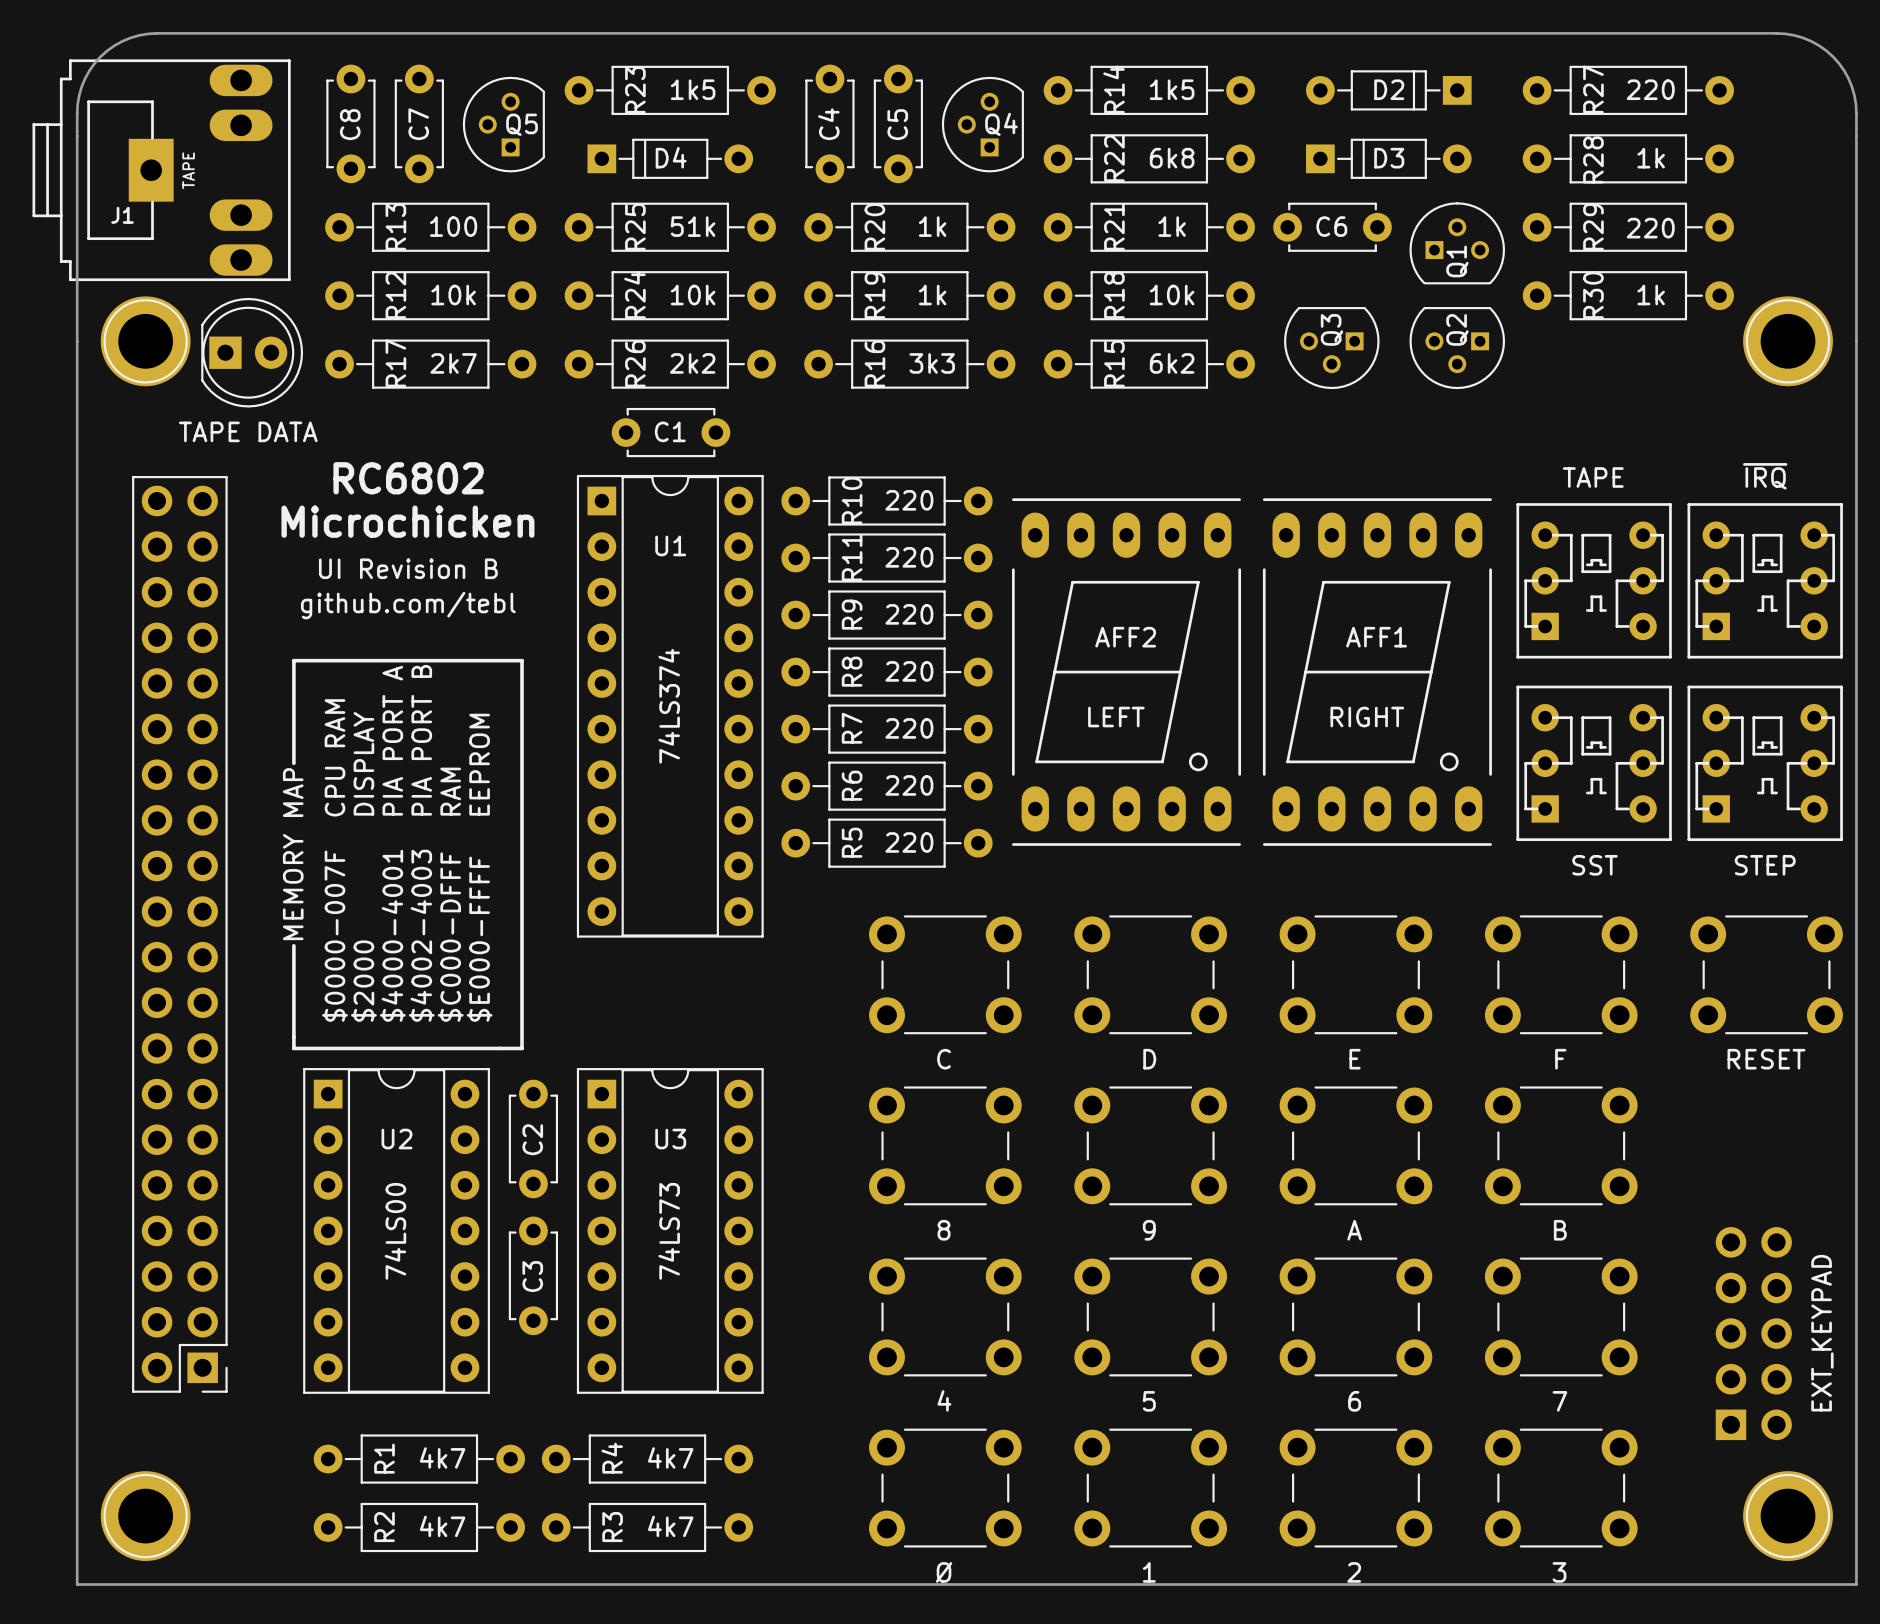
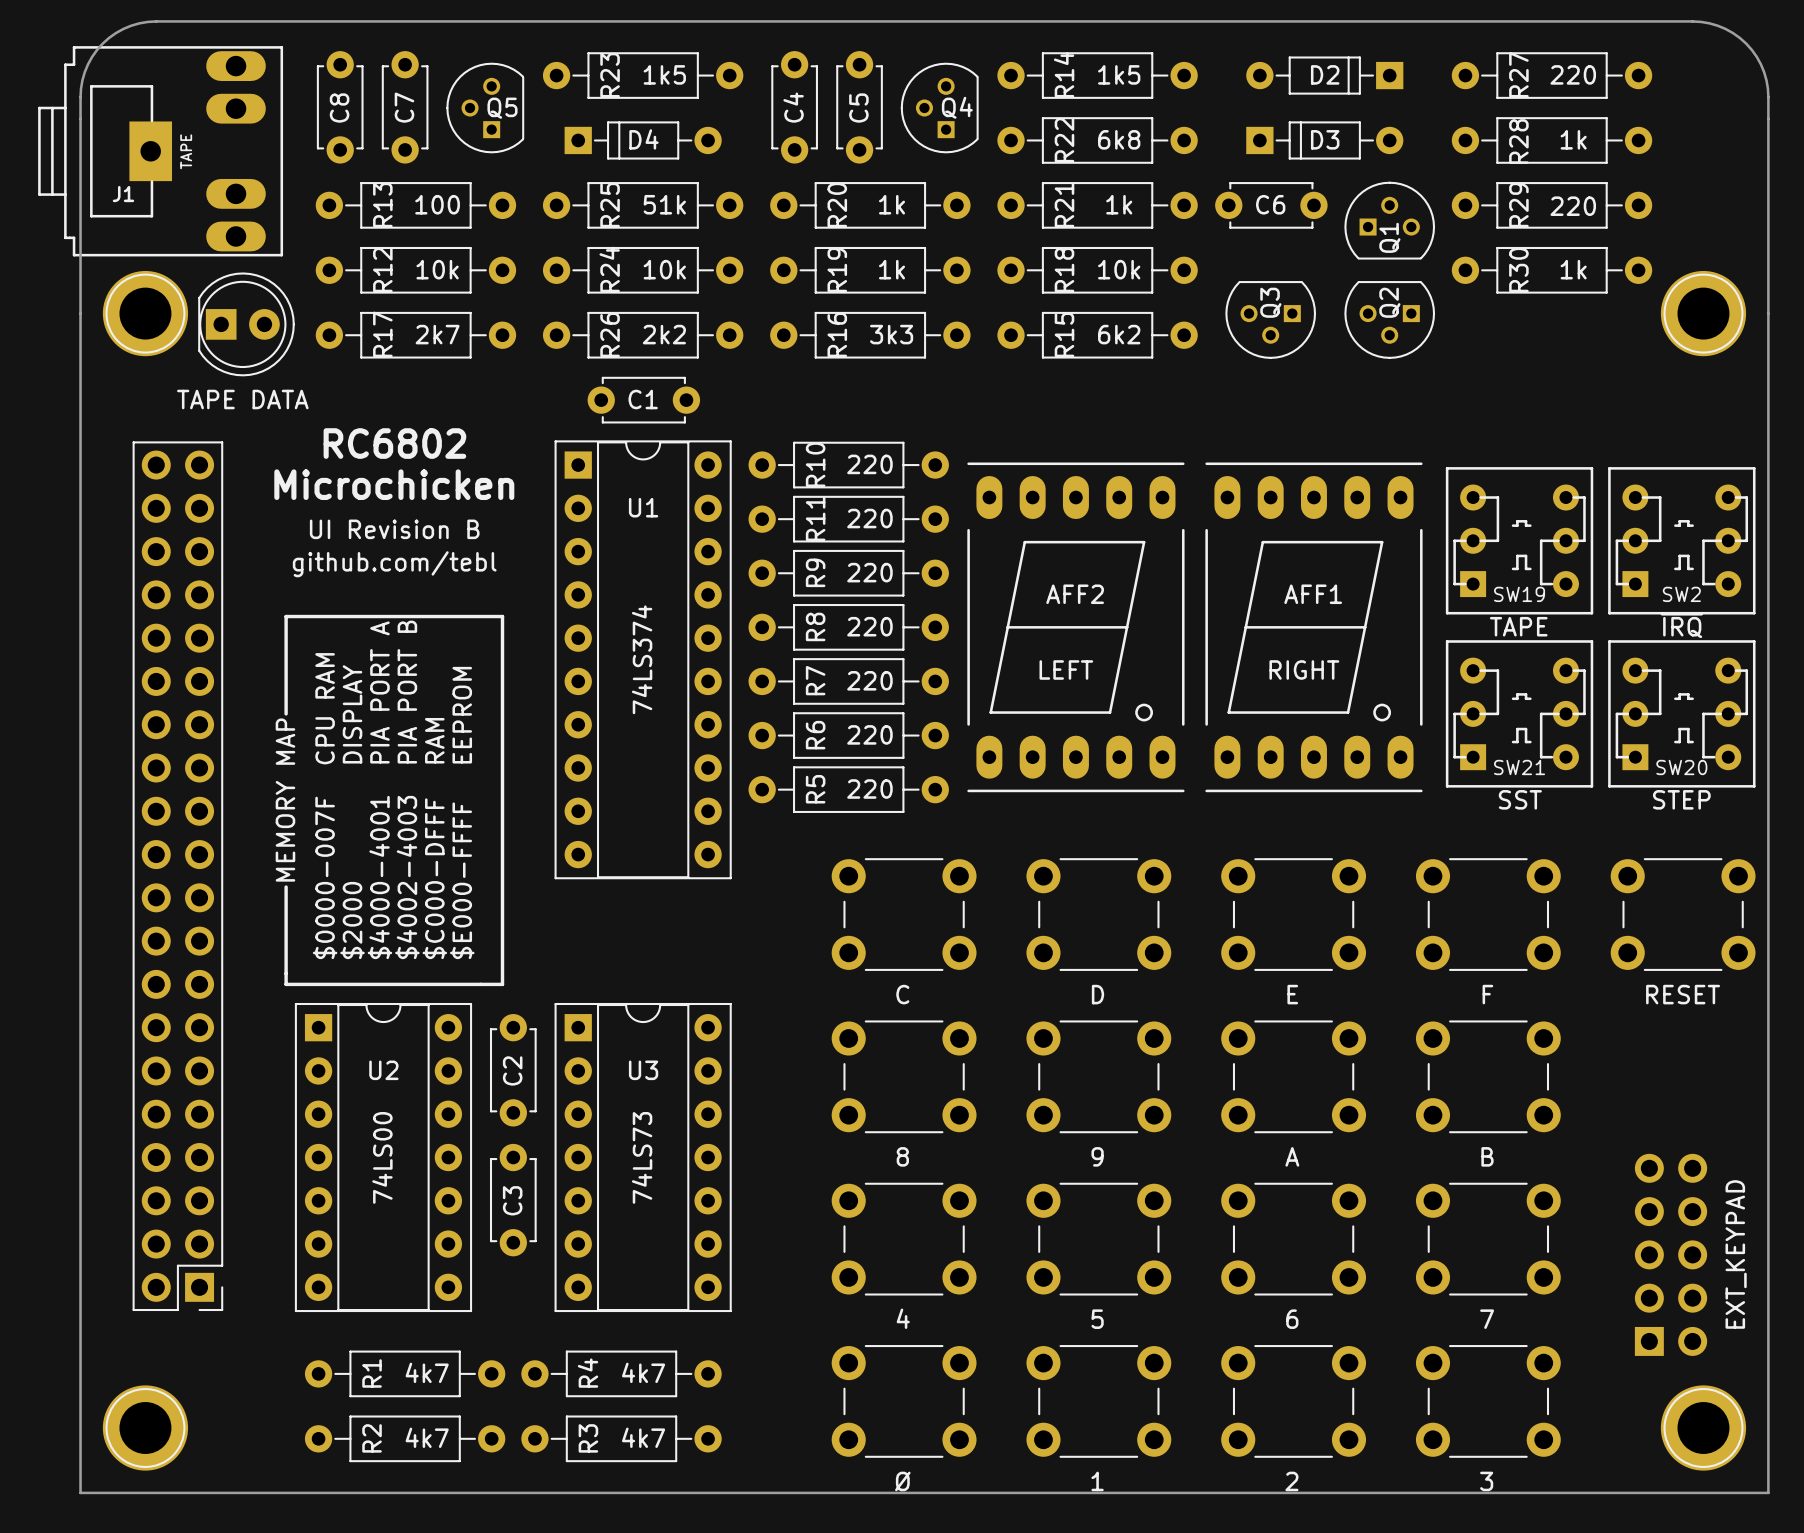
part: TAPE (1594, 580) -> none
SW19: none -> TAPE (1519, 540)
part: ~{IRQ} (1765, 580) -> none
SW2: none -> (1681, 540)
text: none -> ~{IRQ} (1681, 625)
part: SST (1594, 763) -> none
SW21: none -> (1519, 713)
part: STEP (1765, 763) -> none
SW20: none -> STEP (1681, 713)
text: none -> SST (1520, 799)

